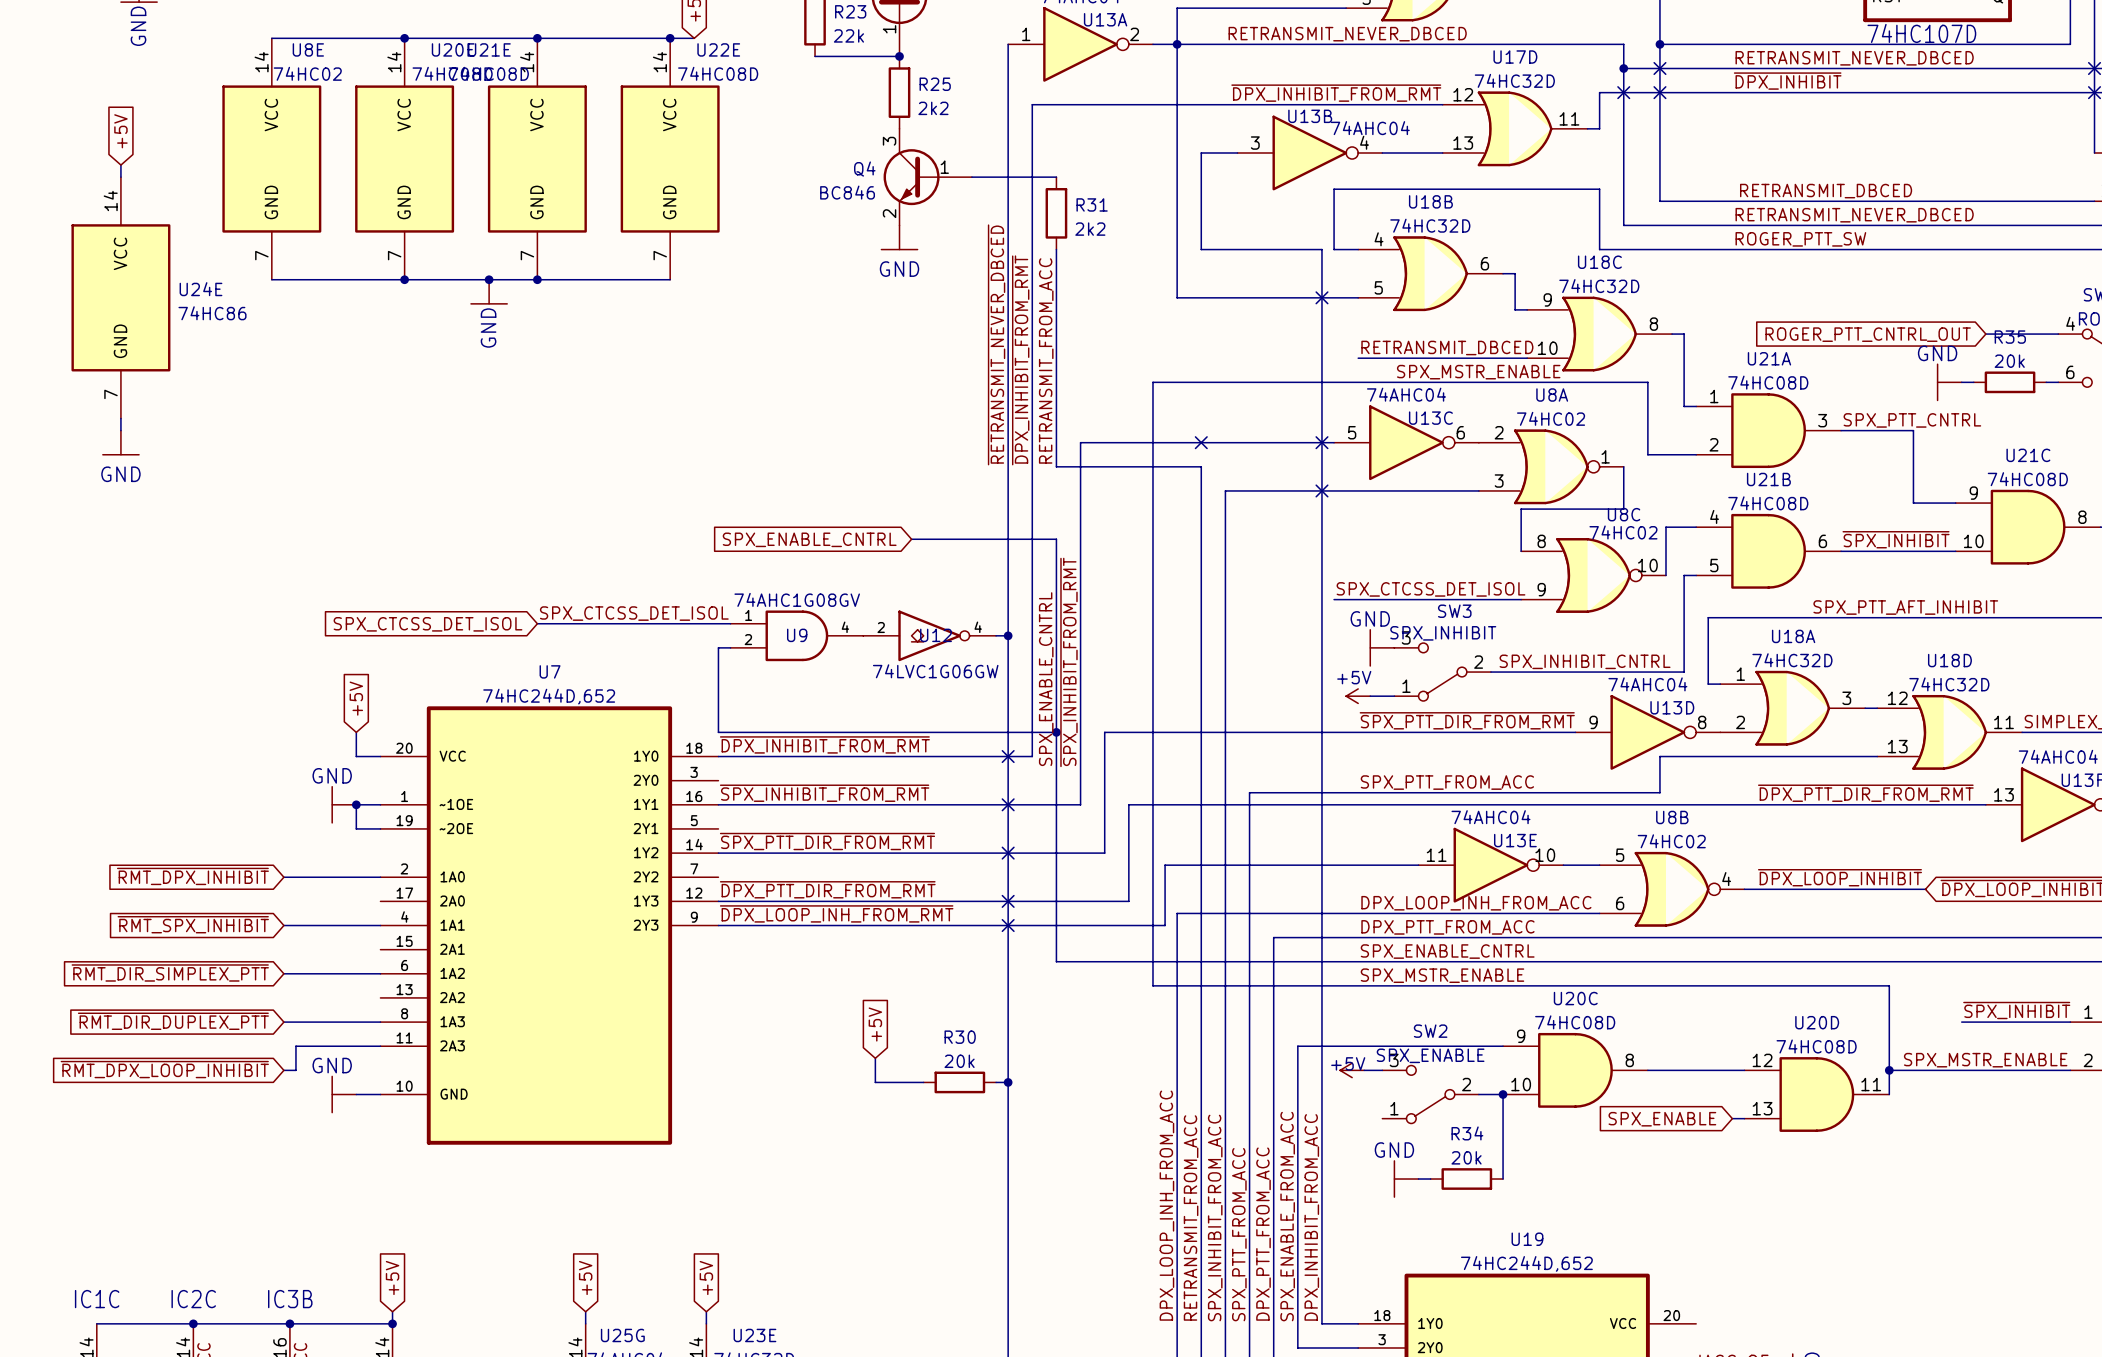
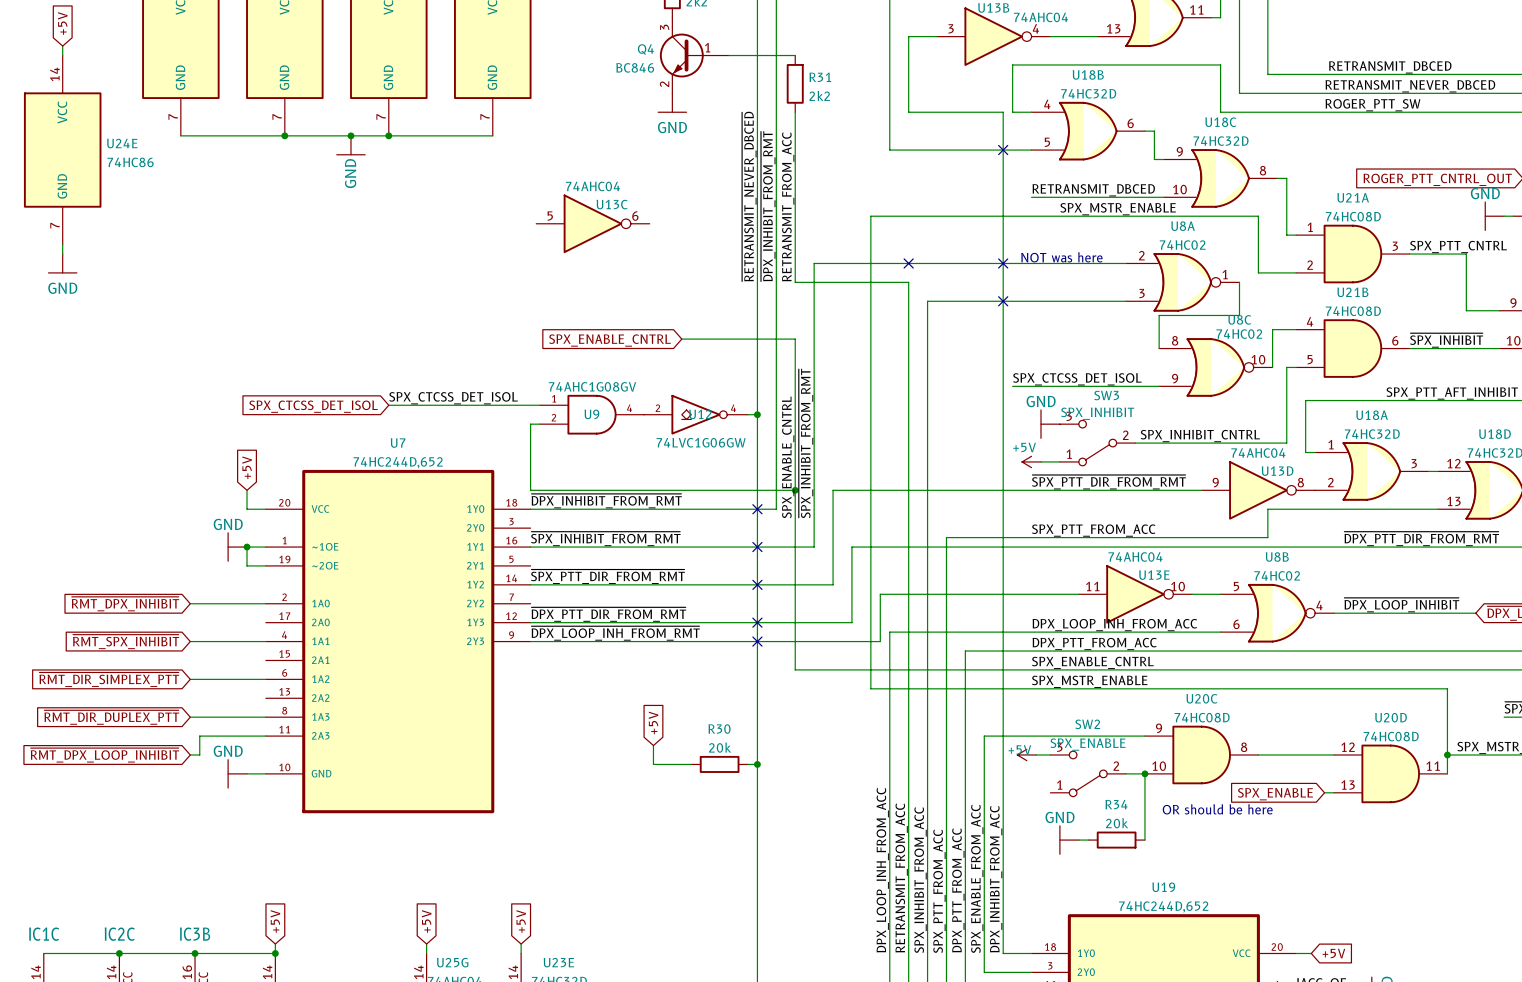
text: none -> NOT was here (1061, 257)
U13C position: (1406, 442) -> (592, 223)
text: none -> OR should be here (1217, 809)
wire: none -> (1296, 953) (1311, 953)
global label: none -> +5V (1333, 953)

